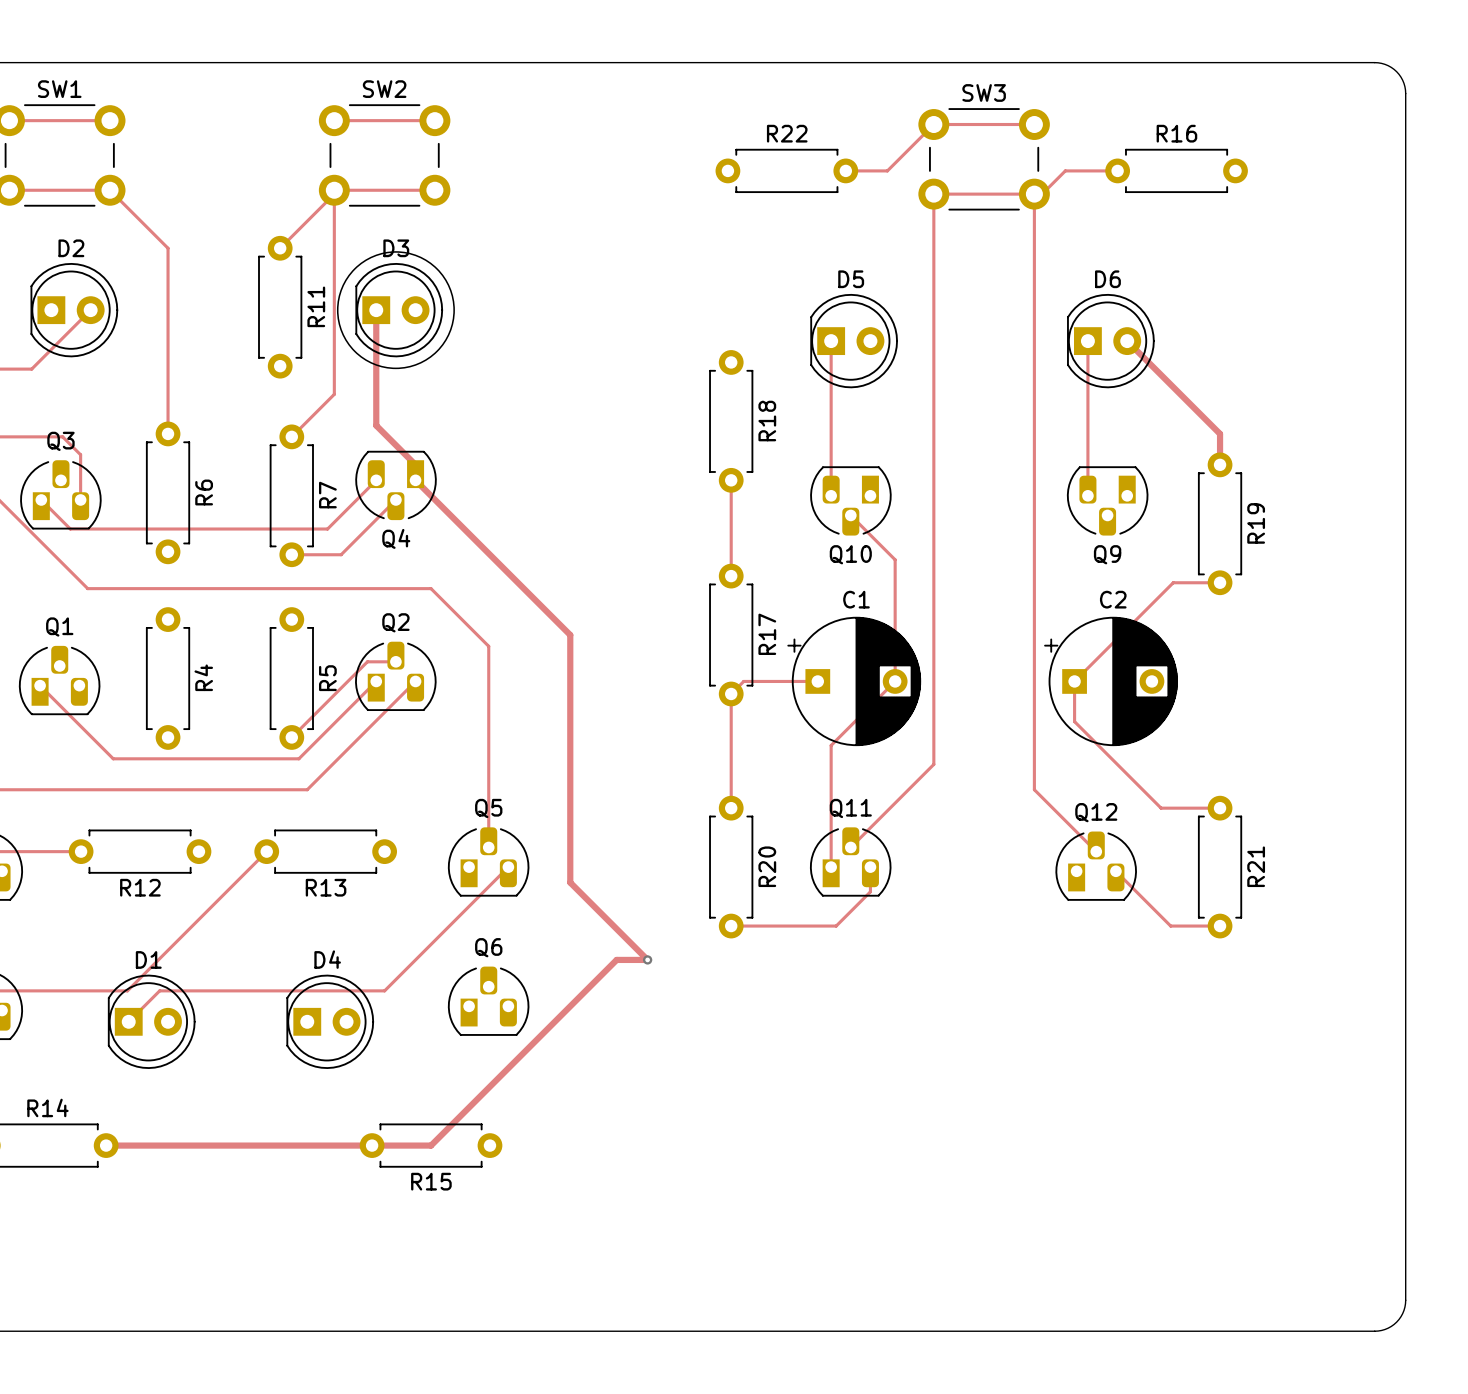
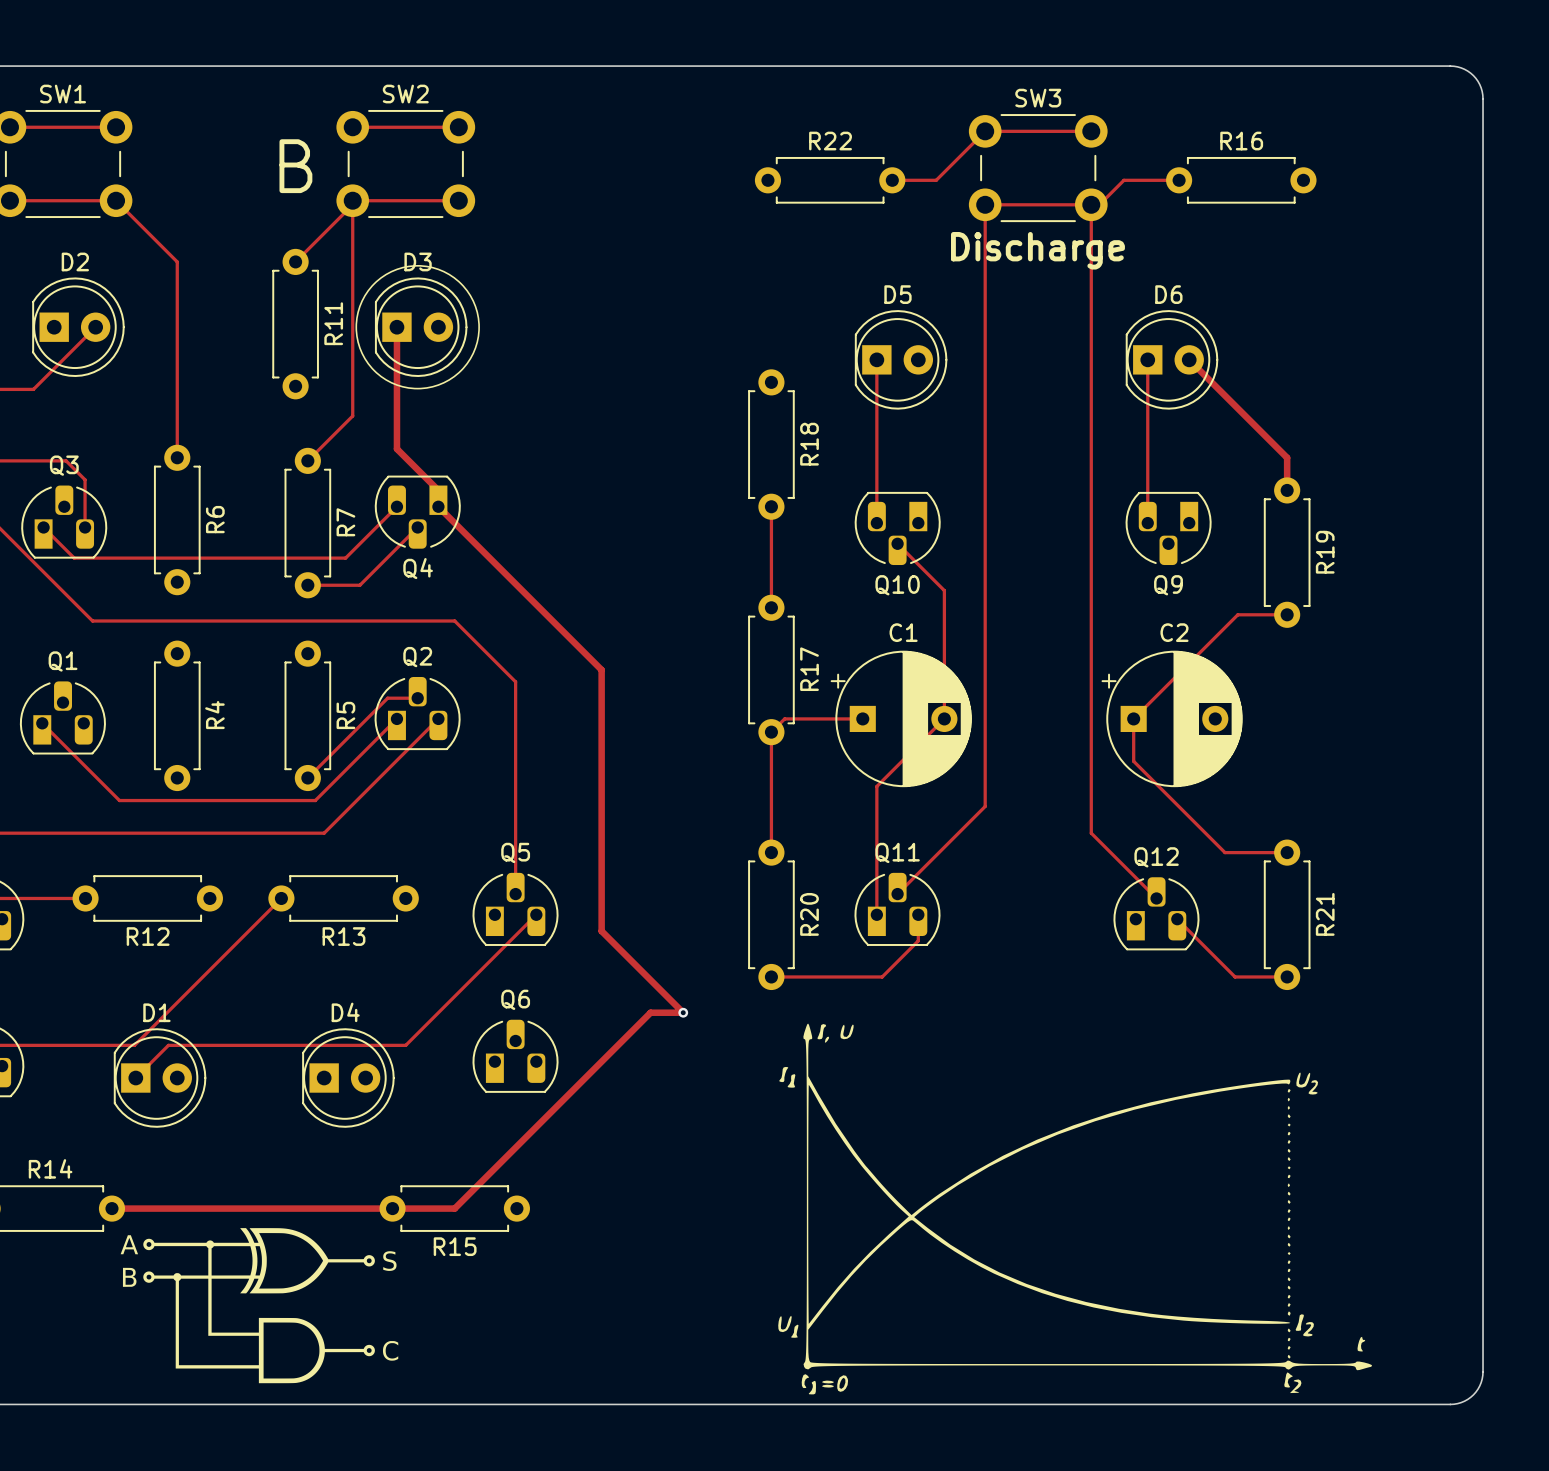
text: none -> B (295, 166)
text: none -> Discharge (1037, 250)
drawing: none -> [778, 1023, 1373, 1395]
drawing: none -> [120, 1228, 399, 1384]

